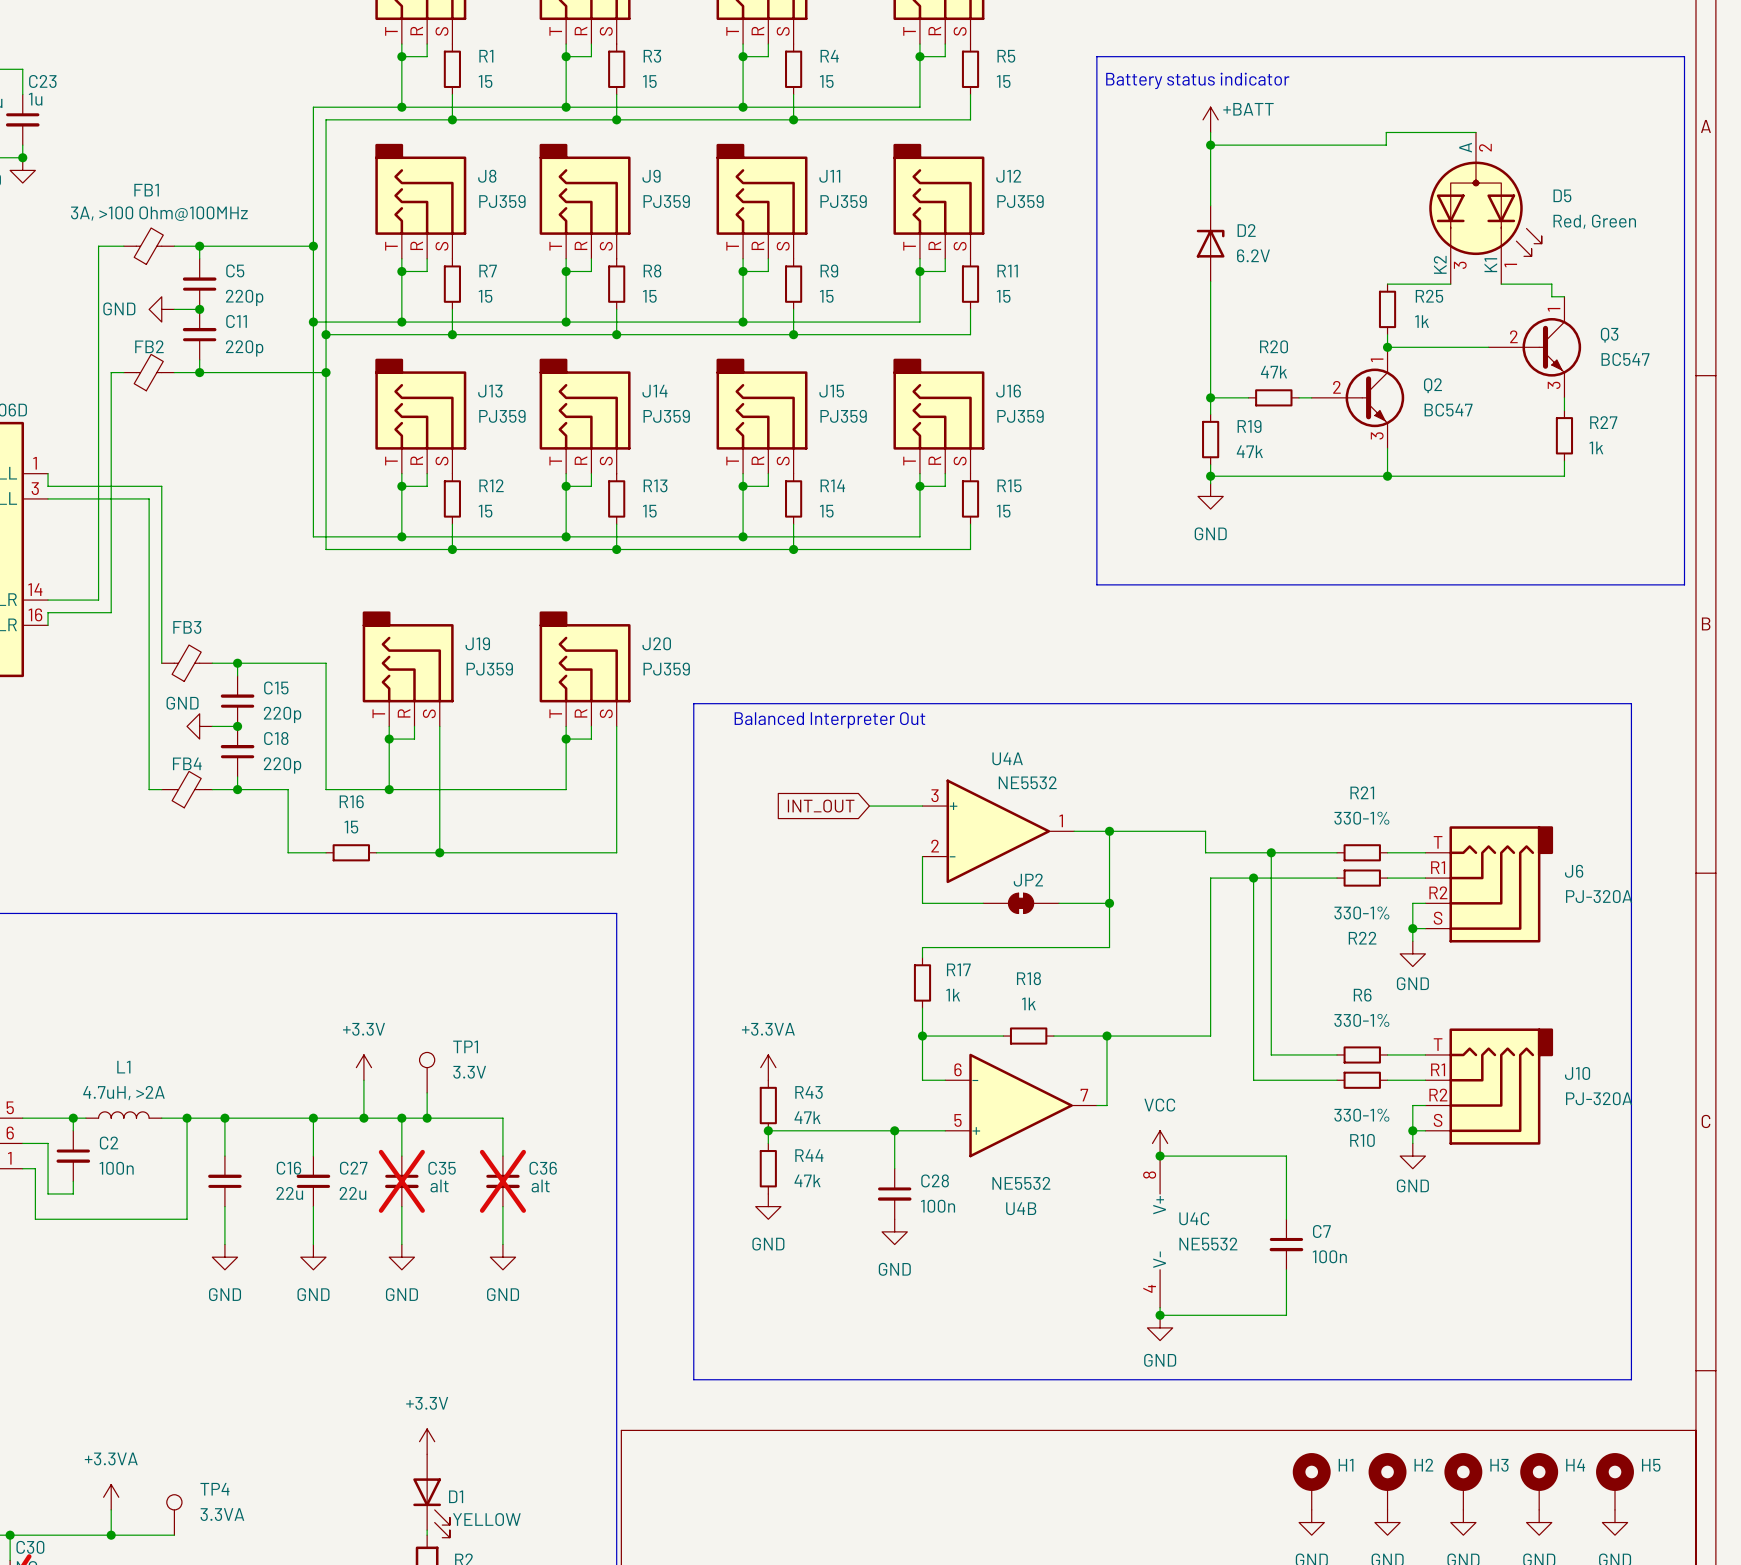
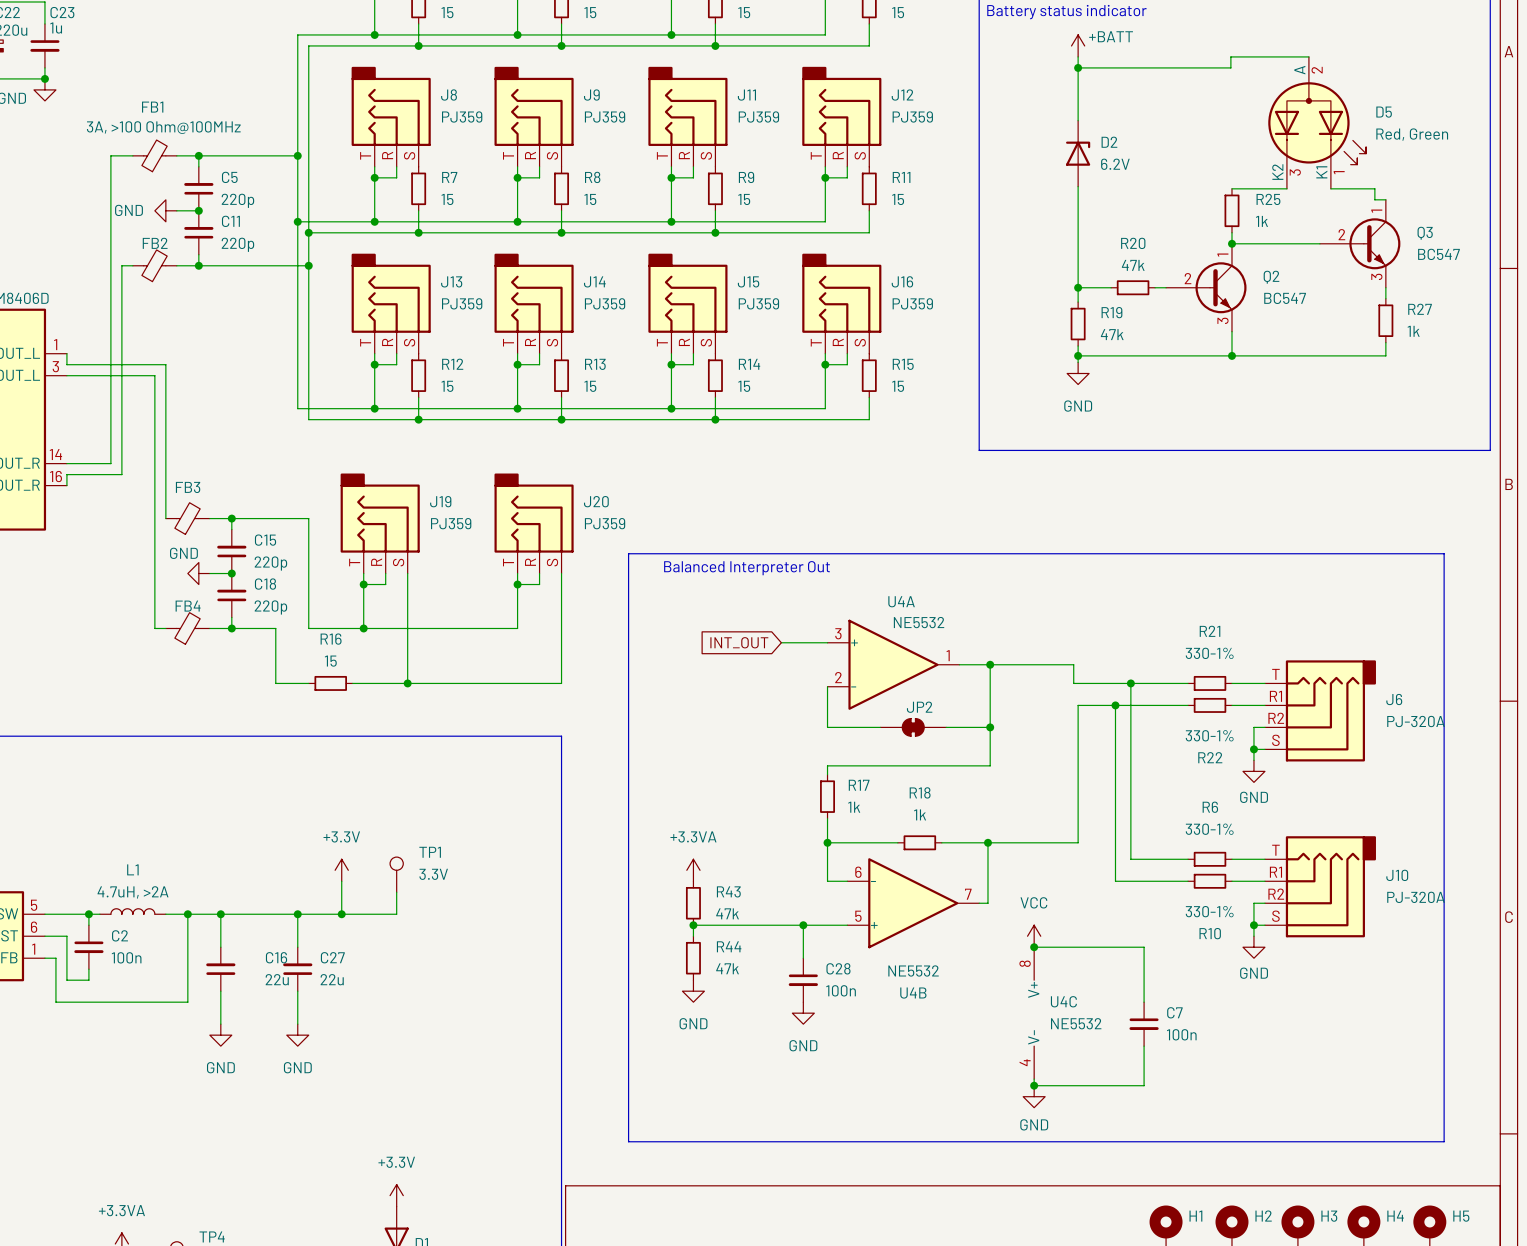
wire: (401, 1118) (401, 1156) -> none
junction: (401, 1118) -> none
wire: (427, 1118) (502, 1118) (502, 1156) -> none
junction: (427, 1118) -> none
C35: alt (401, 1181) -> none
C36: alt (502, 1181) -> none
wire: (401, 1206) (401, 1244) -> none
wire: (502, 1206) (502, 1244) -> none
power symbol: GND (401, 1257) -> none
power symbol: GND (502, 1257) -> none

